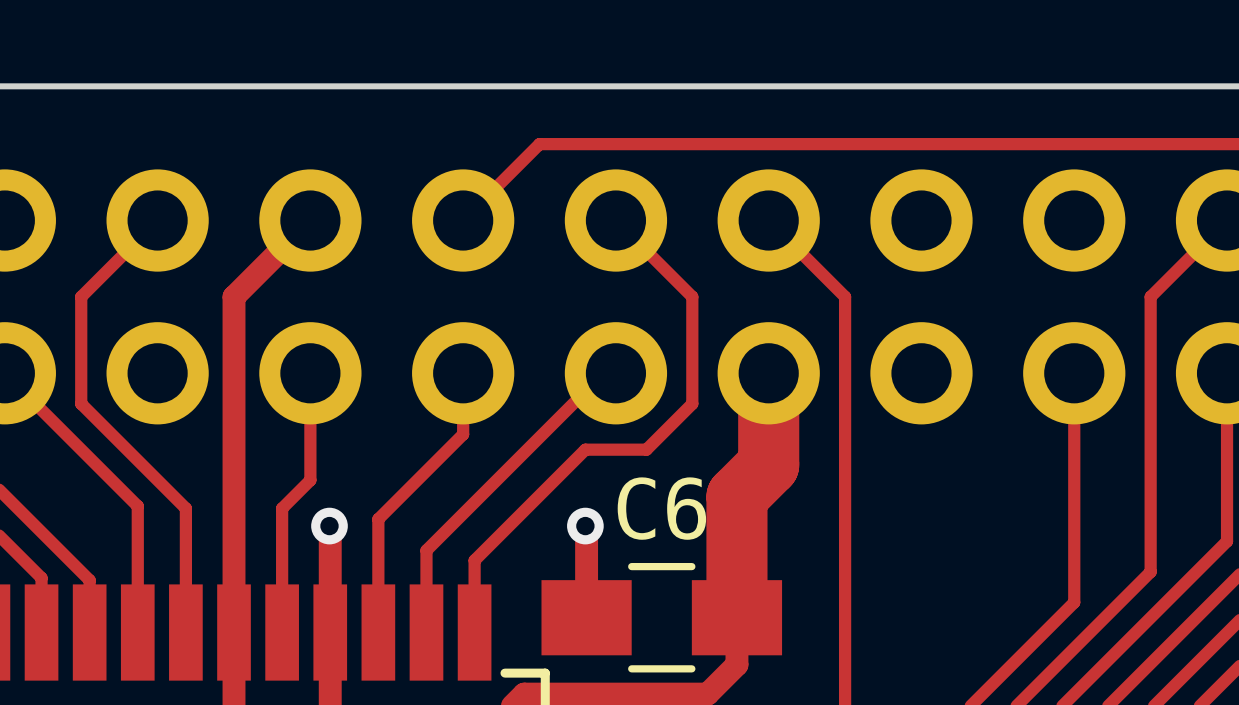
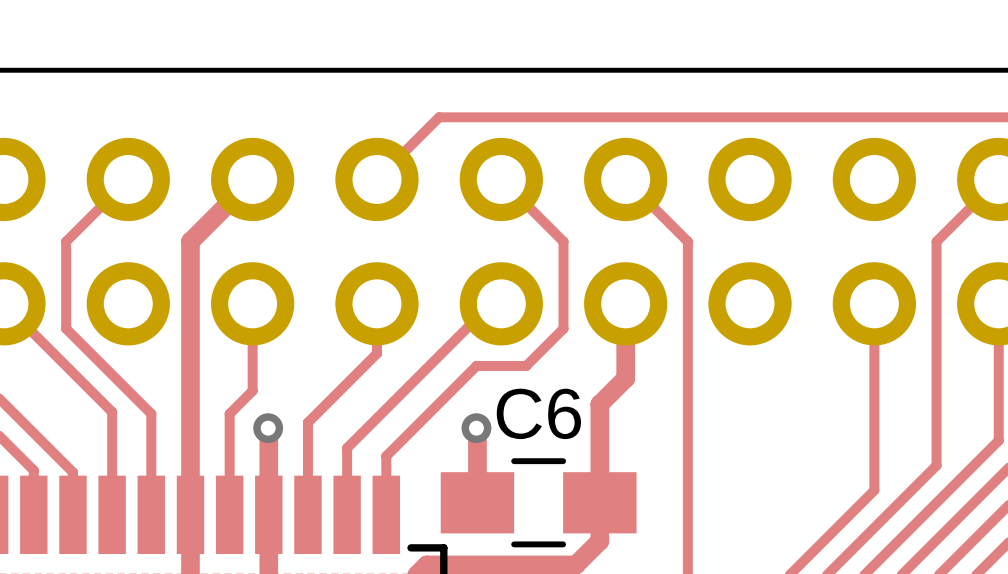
track width: thick (768, 373) (768, 464) (736, 496) (736, 617) -> thin (625, 303) (625, 378) (599, 404) (599, 502)

